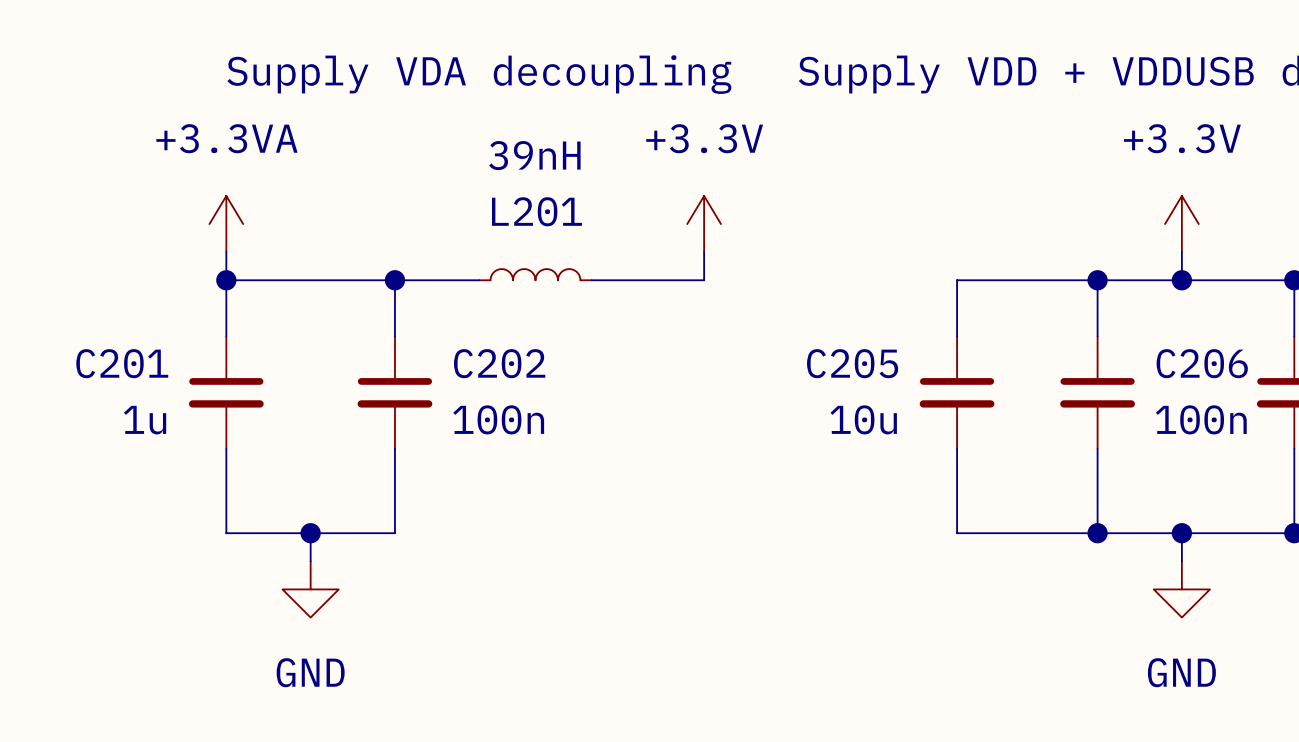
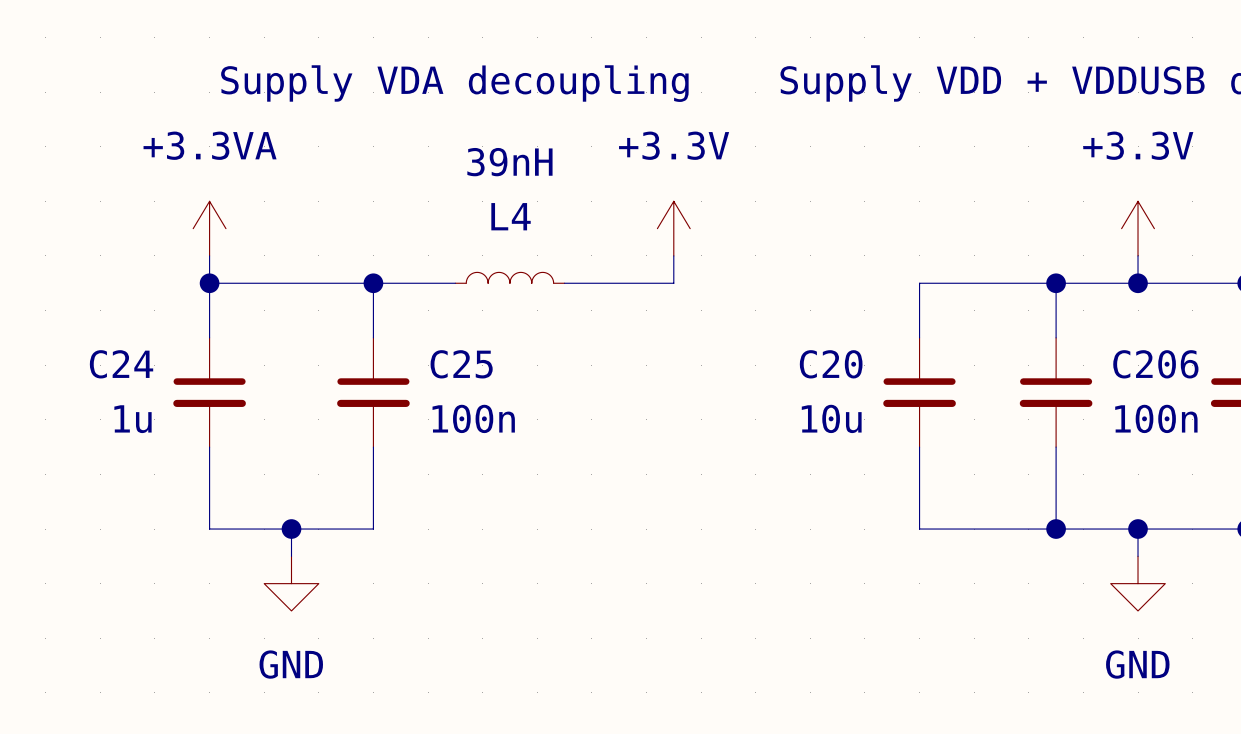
L201 name: L201 (536, 211) -> L4 (511, 216)
C201 name: C201 (122, 363) -> C24 (121, 364)
C202 name: C202 (499, 363) -> C25 (461, 364)
C205 name: C205 (852, 363) -> C20 (831, 364)

